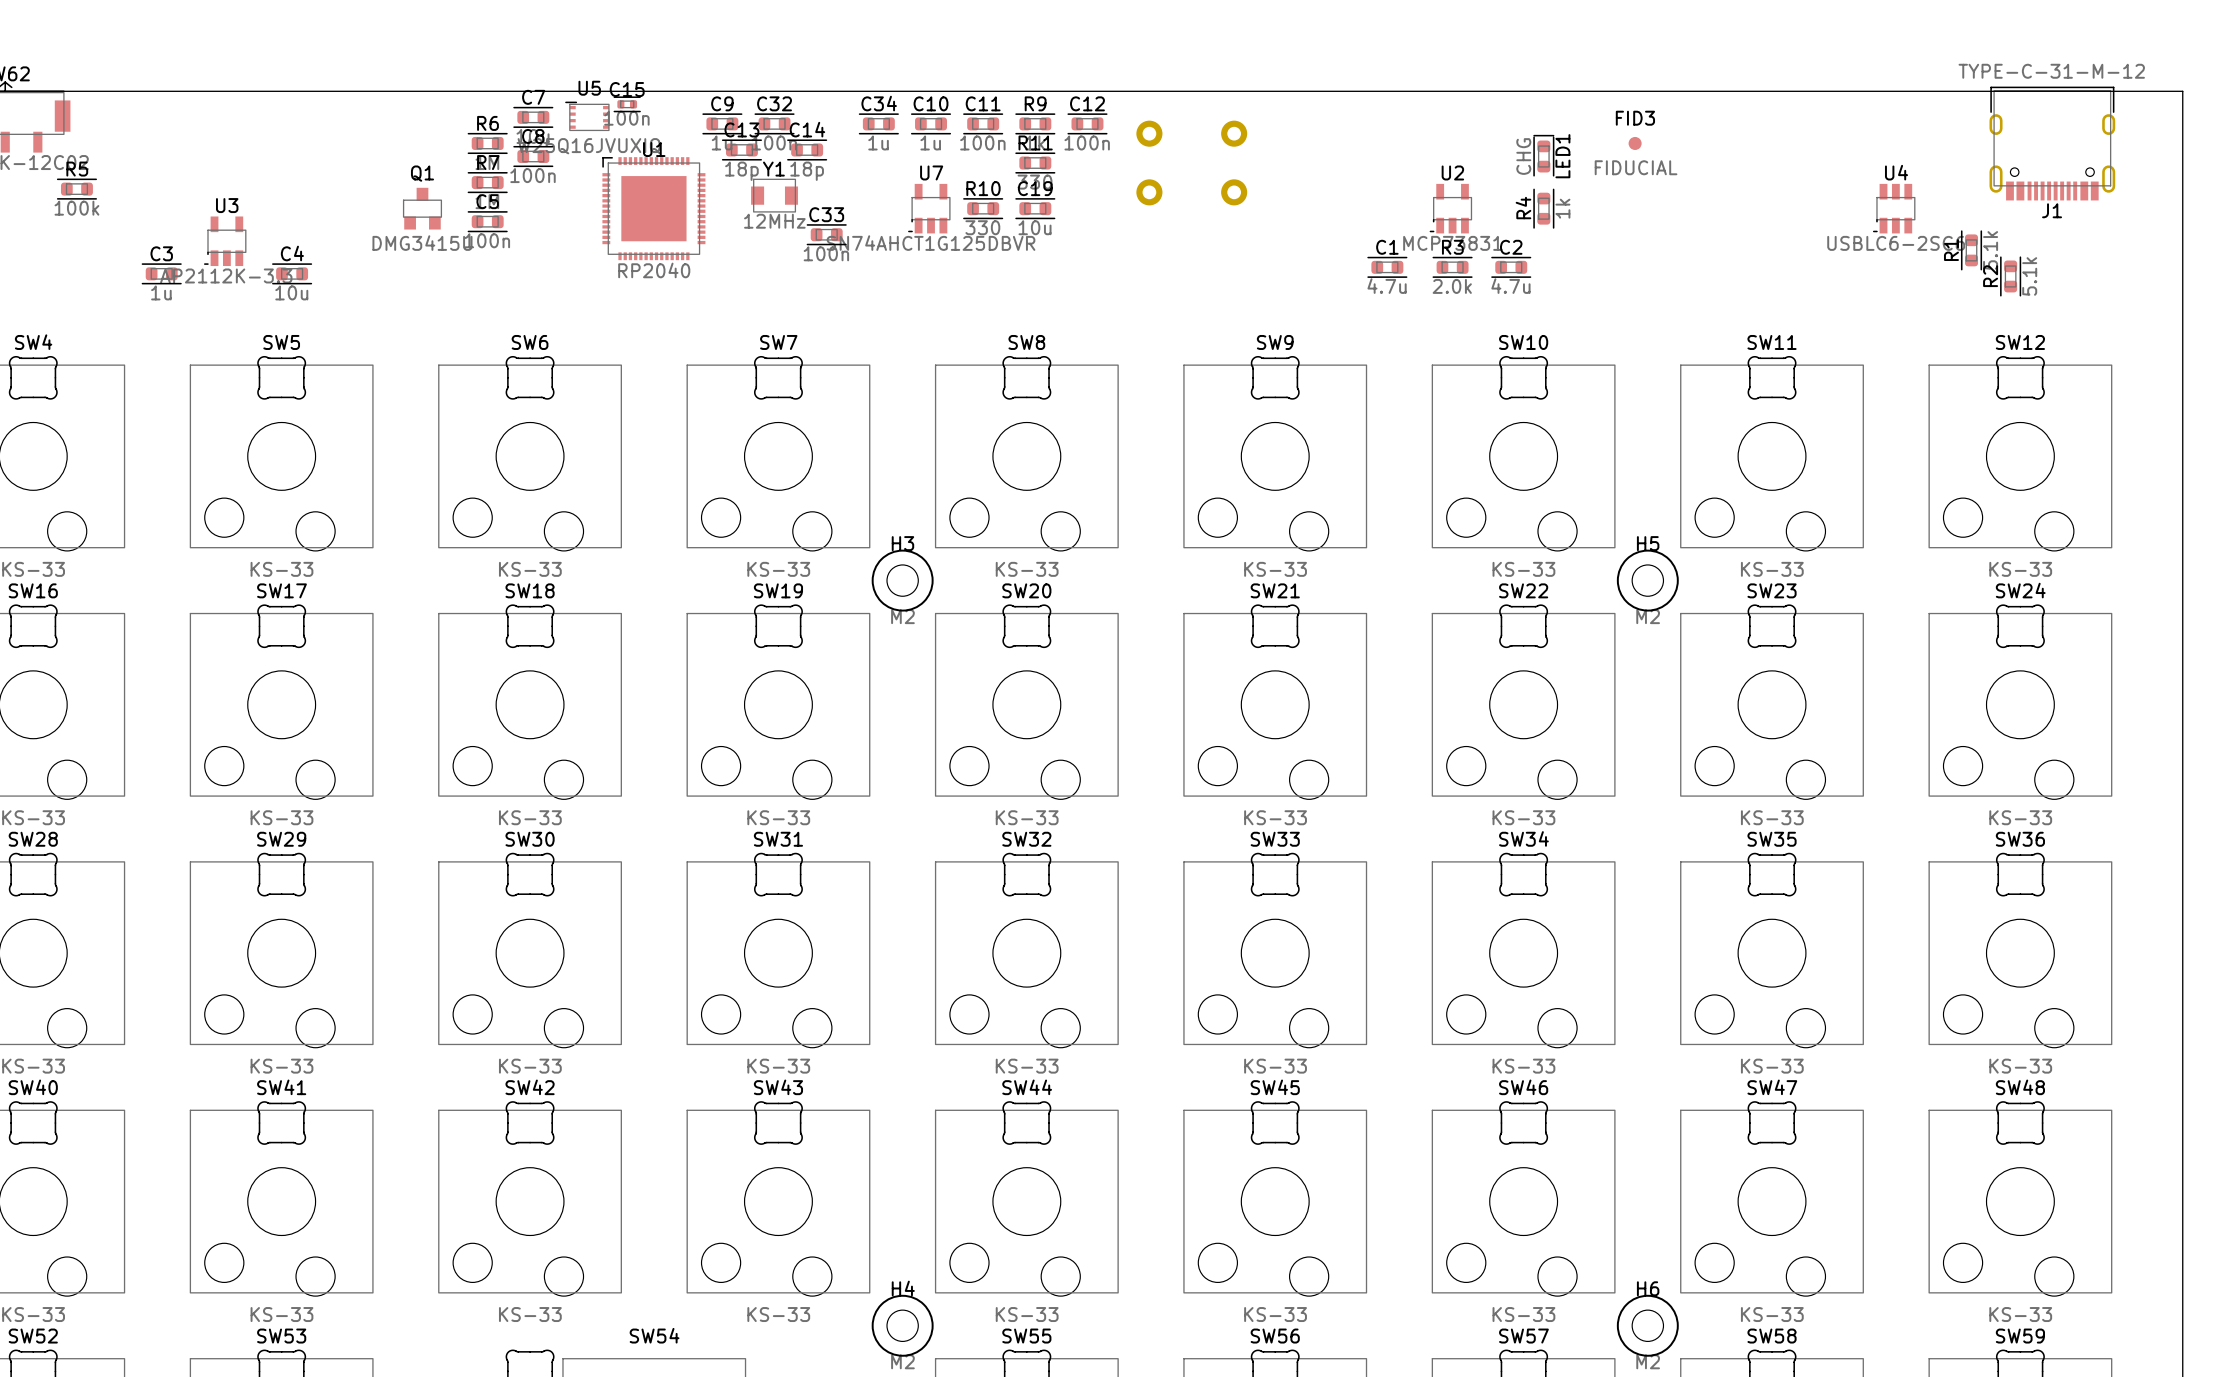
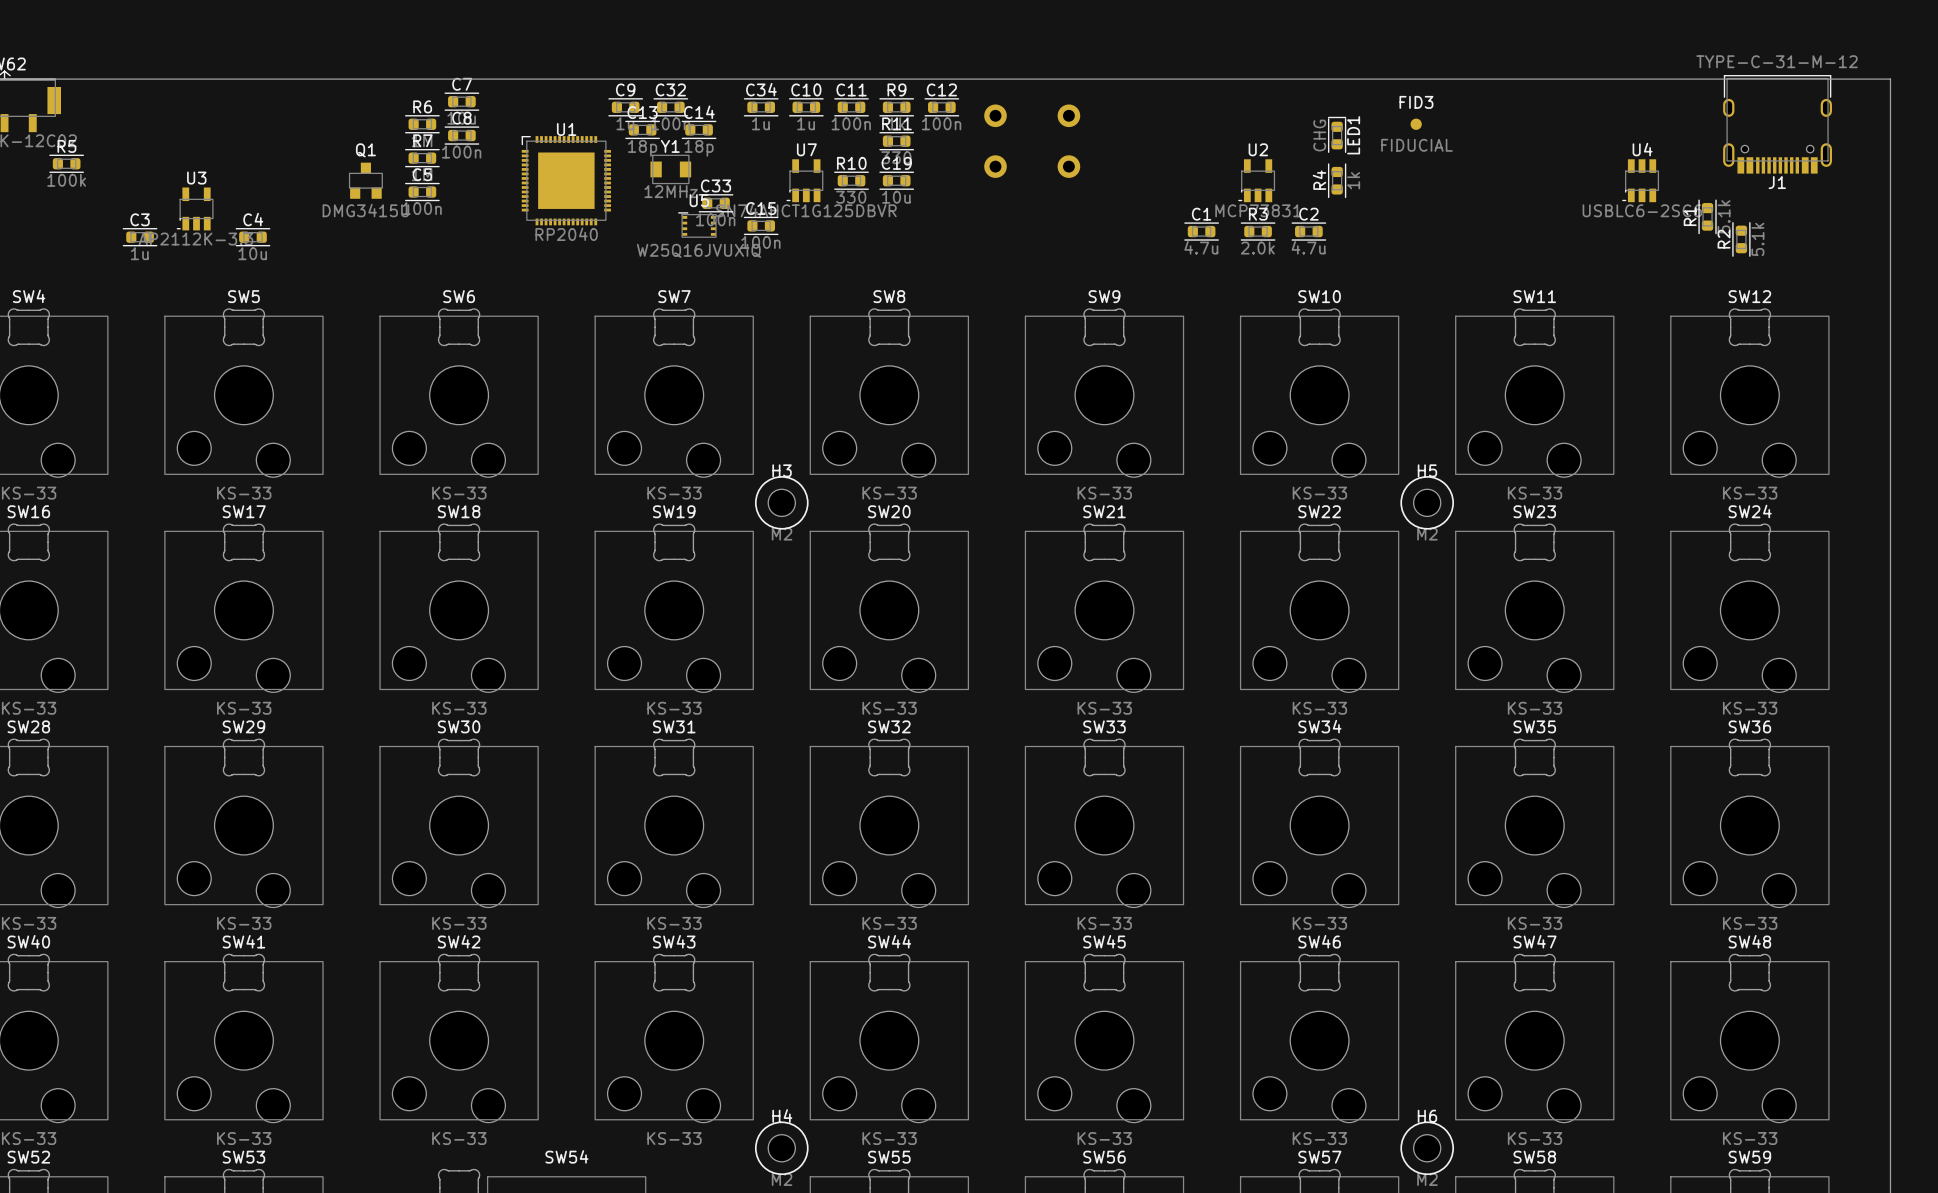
C15 footprint: [613, 96, 641, 113] -> [743, 216, 779, 236]
U5 position: (587, 116) -> (697, 224)

